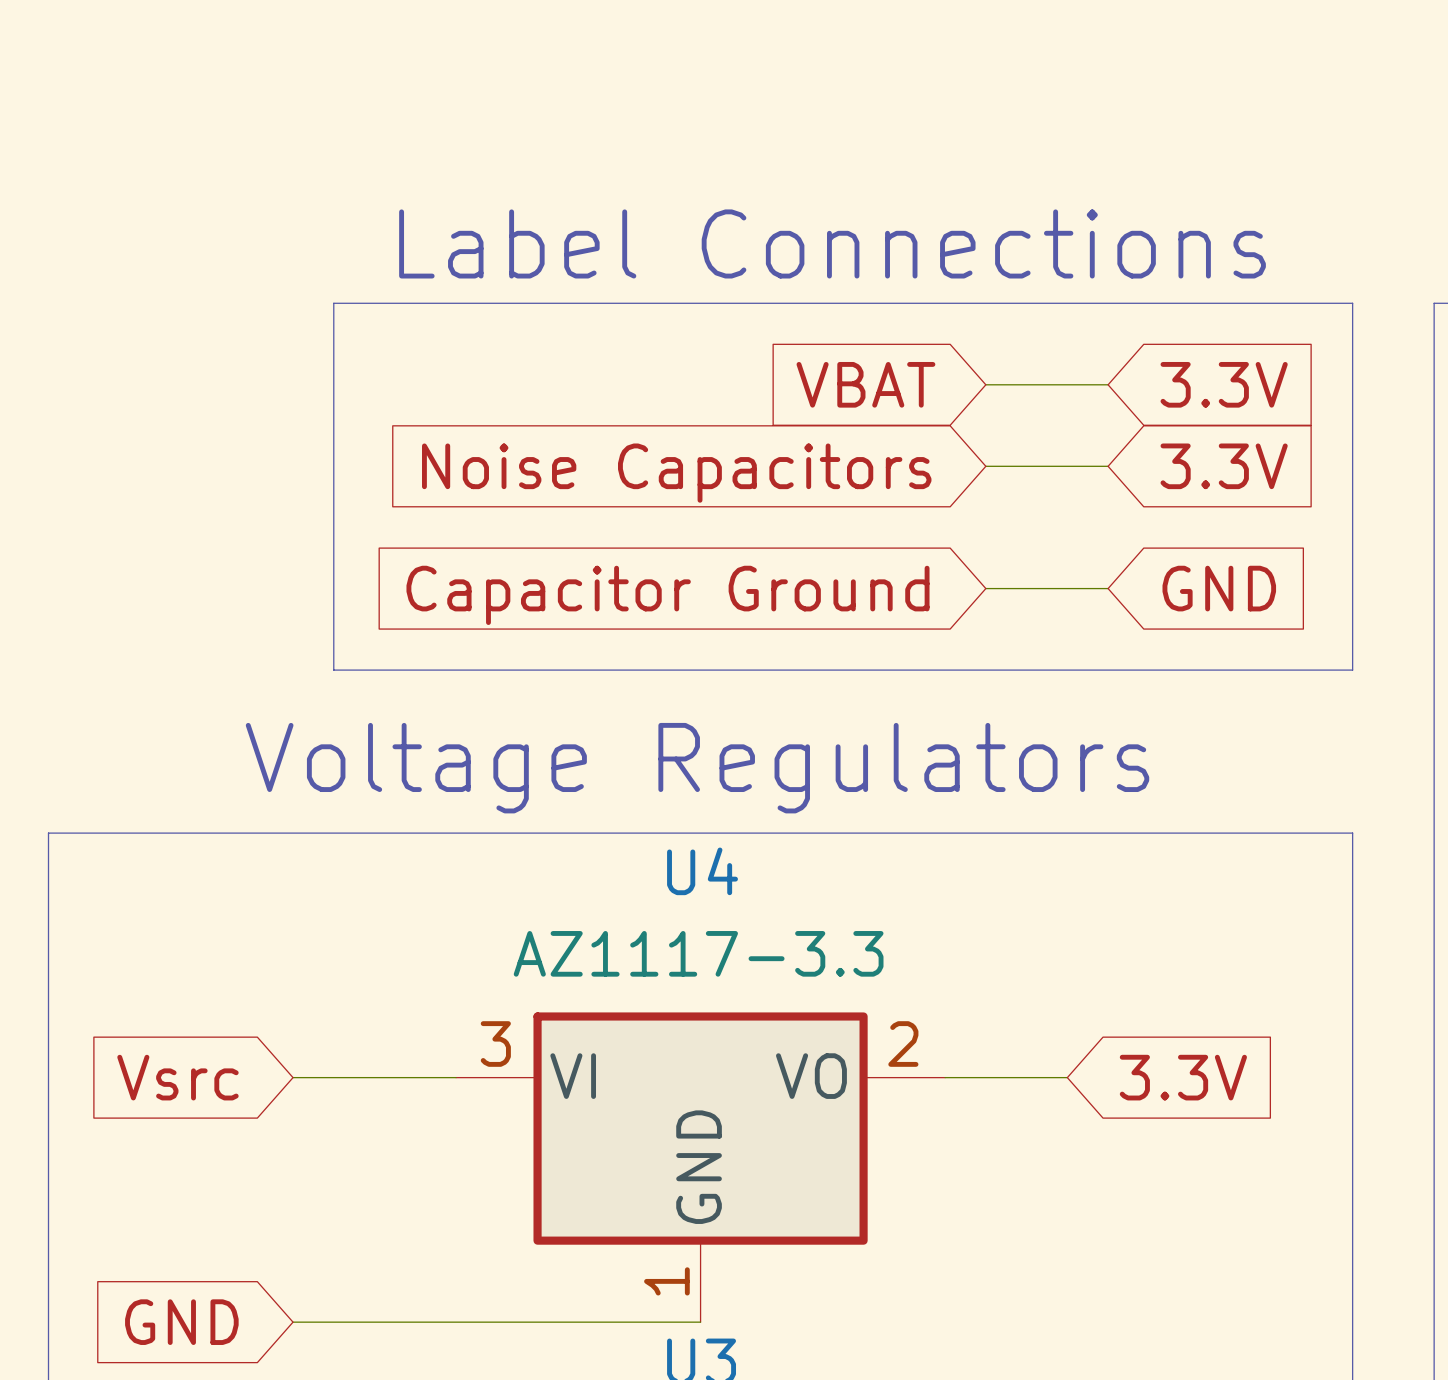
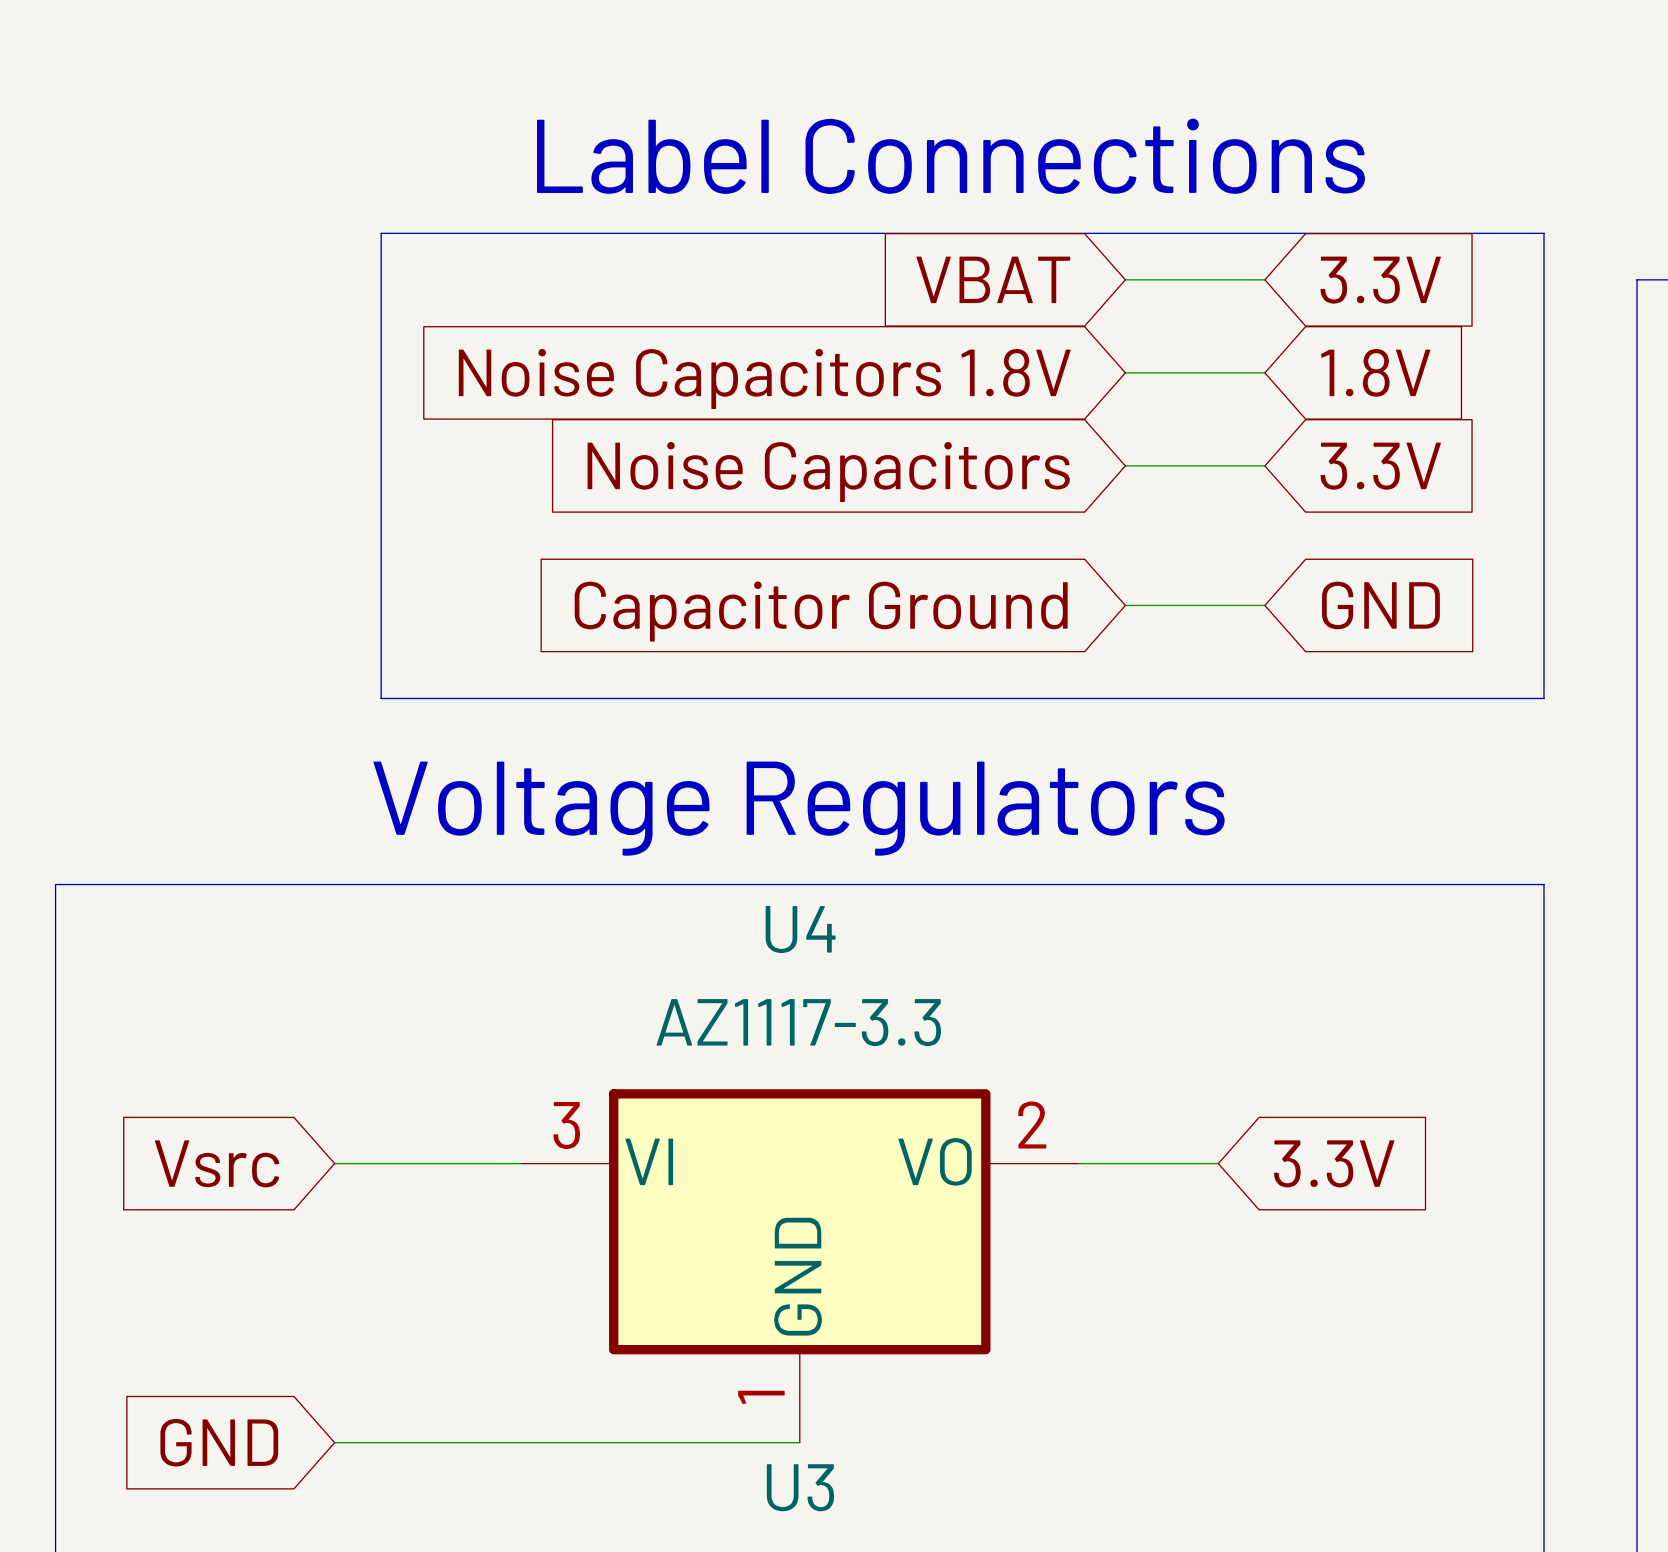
text position: Label Connections (832, 243) -> Label Connections (950, 156)
line: (333, 303) (1352, 303) -> (381, 279) (381, 233) (1543, 233) (1543, 279)
global label: none -> VBAT (993, 279)
global label: none -> 3.3V (1380, 280)
global label: VBAT (865, 384) -> Noise Capacitors 1.8V (764, 379)
global label: 3.3V (1224, 384) -> 1.8V (1375, 372)

